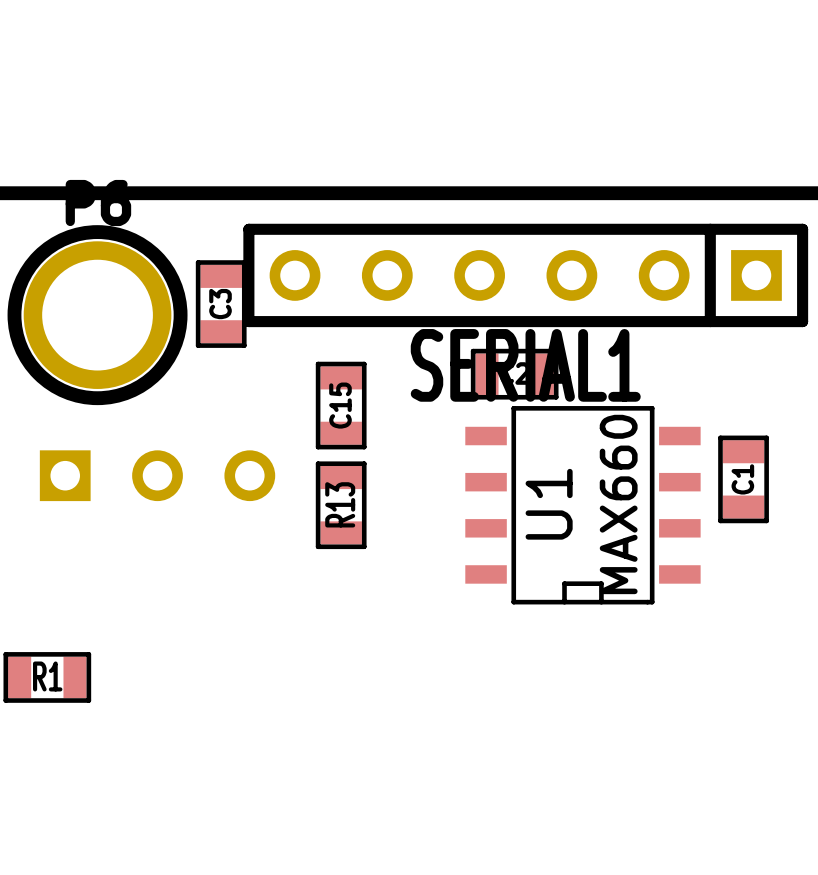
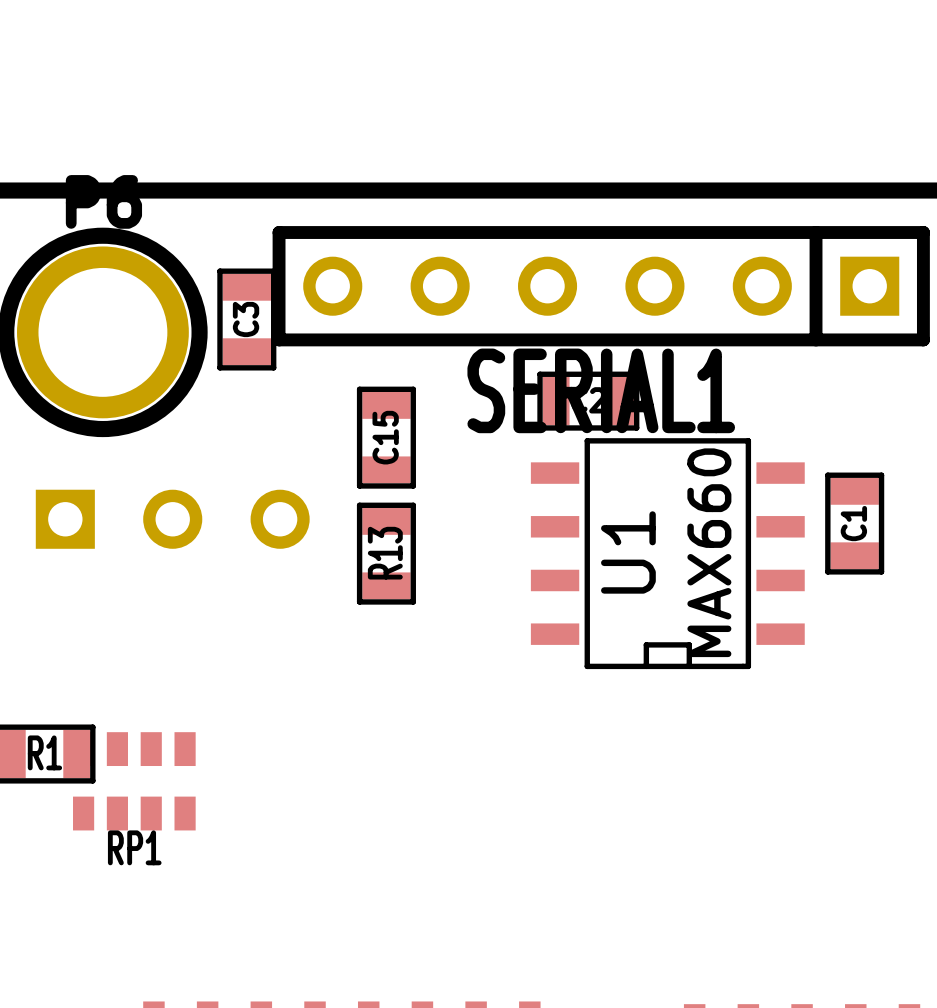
RP1: none -> (134, 781)

